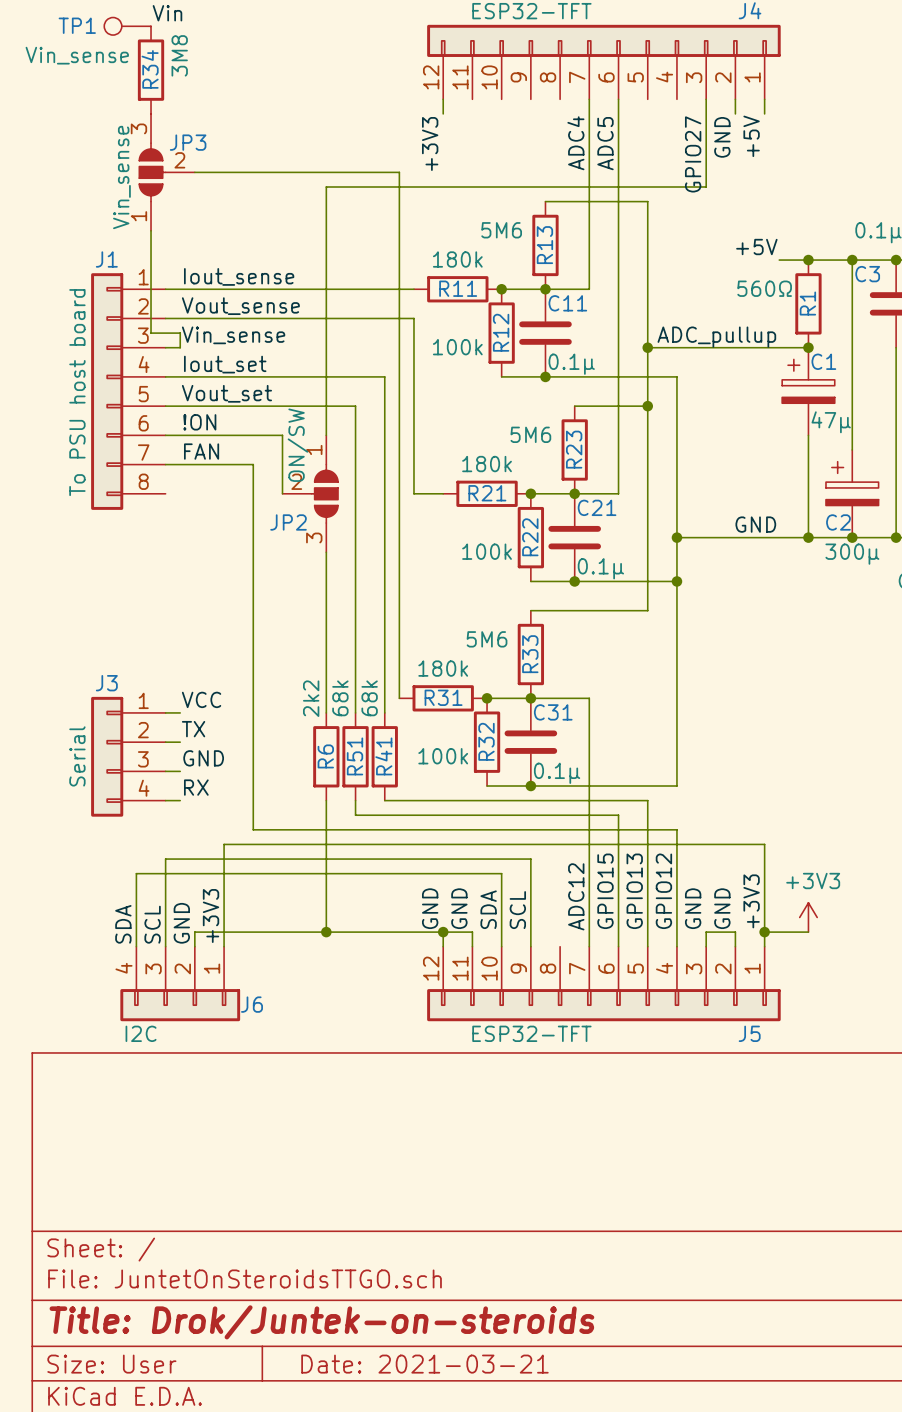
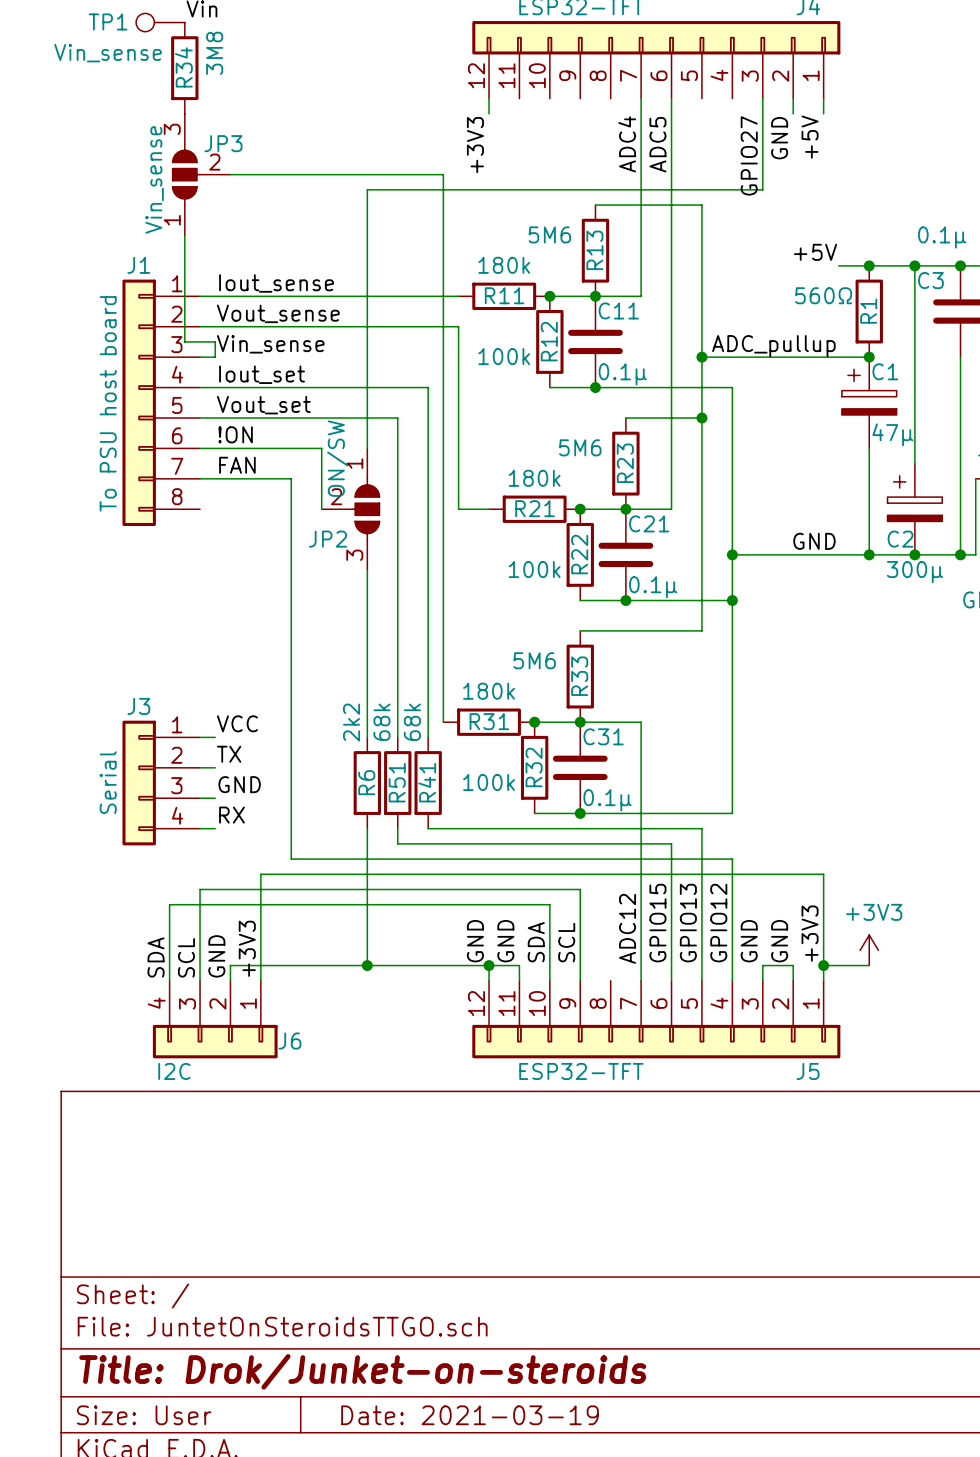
title block: Title: Drok/Juntek-on-steroids (321, 1322) -> Title: Drok/Junket-on-steroids (362, 1371)
title block: Date: 2021-03-21 (424, 1364) -> Date: 2021-03-19 (470, 1415)

